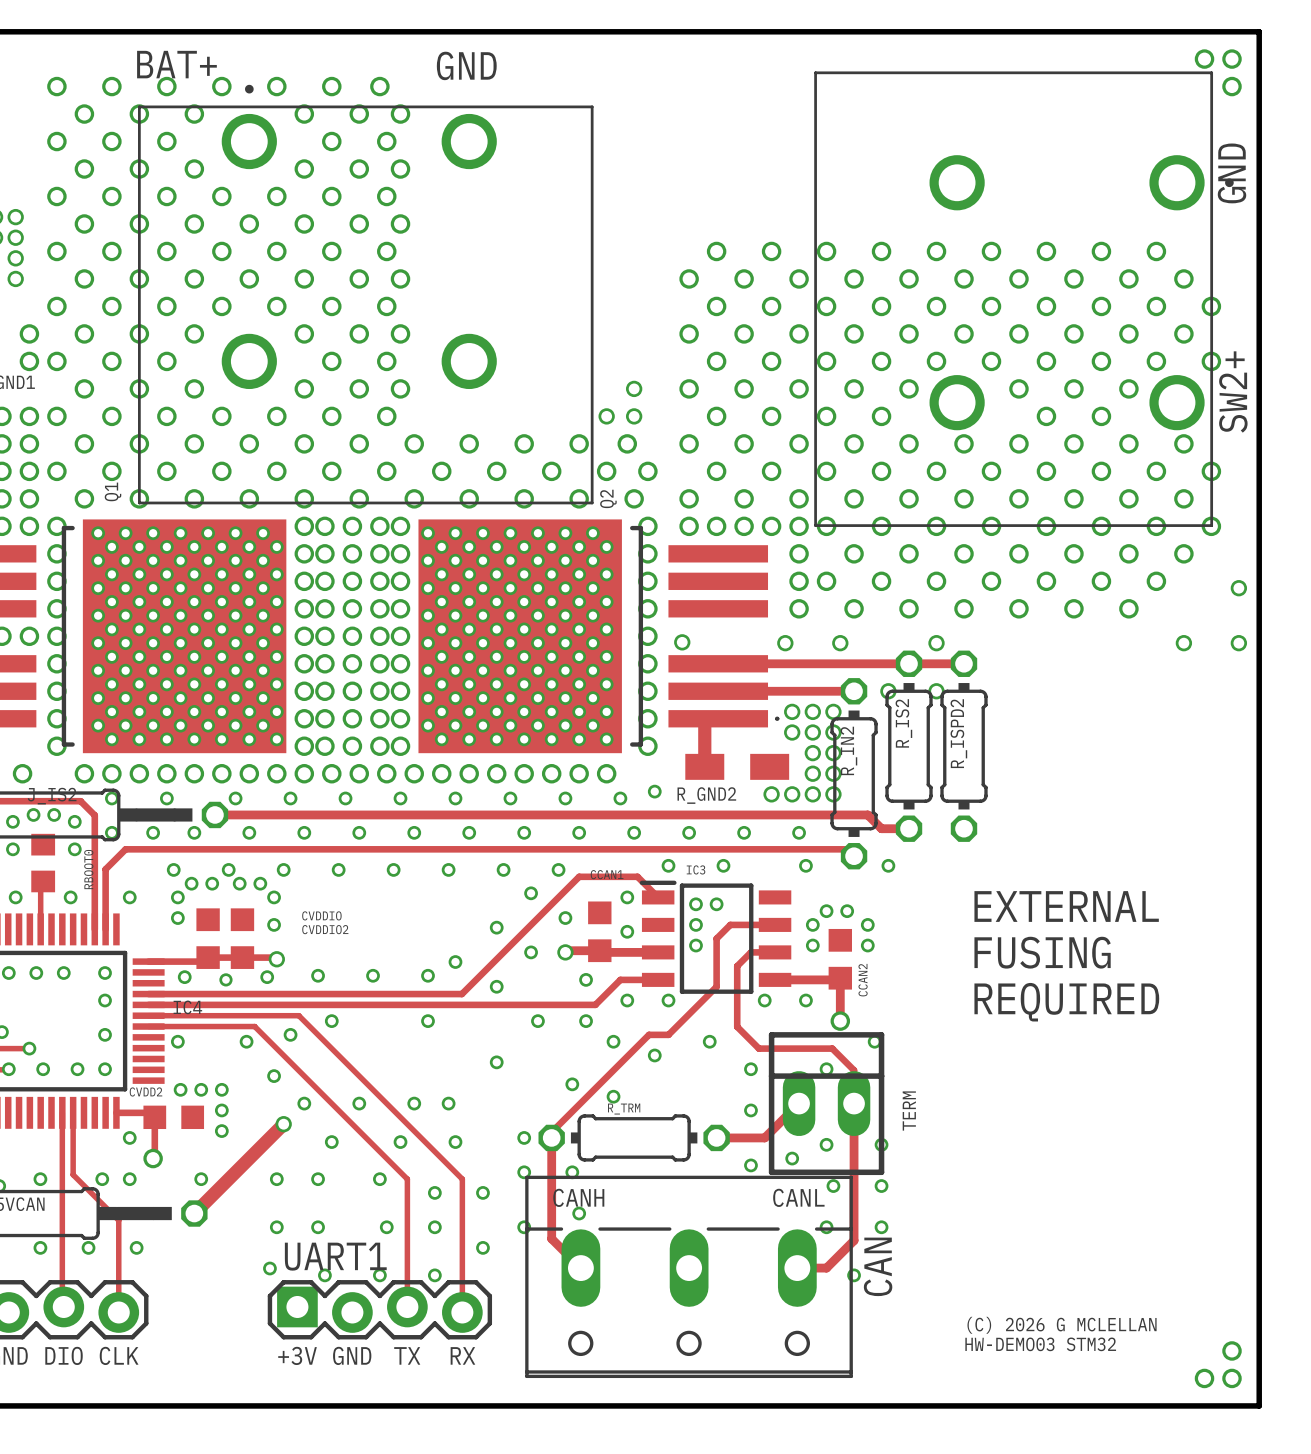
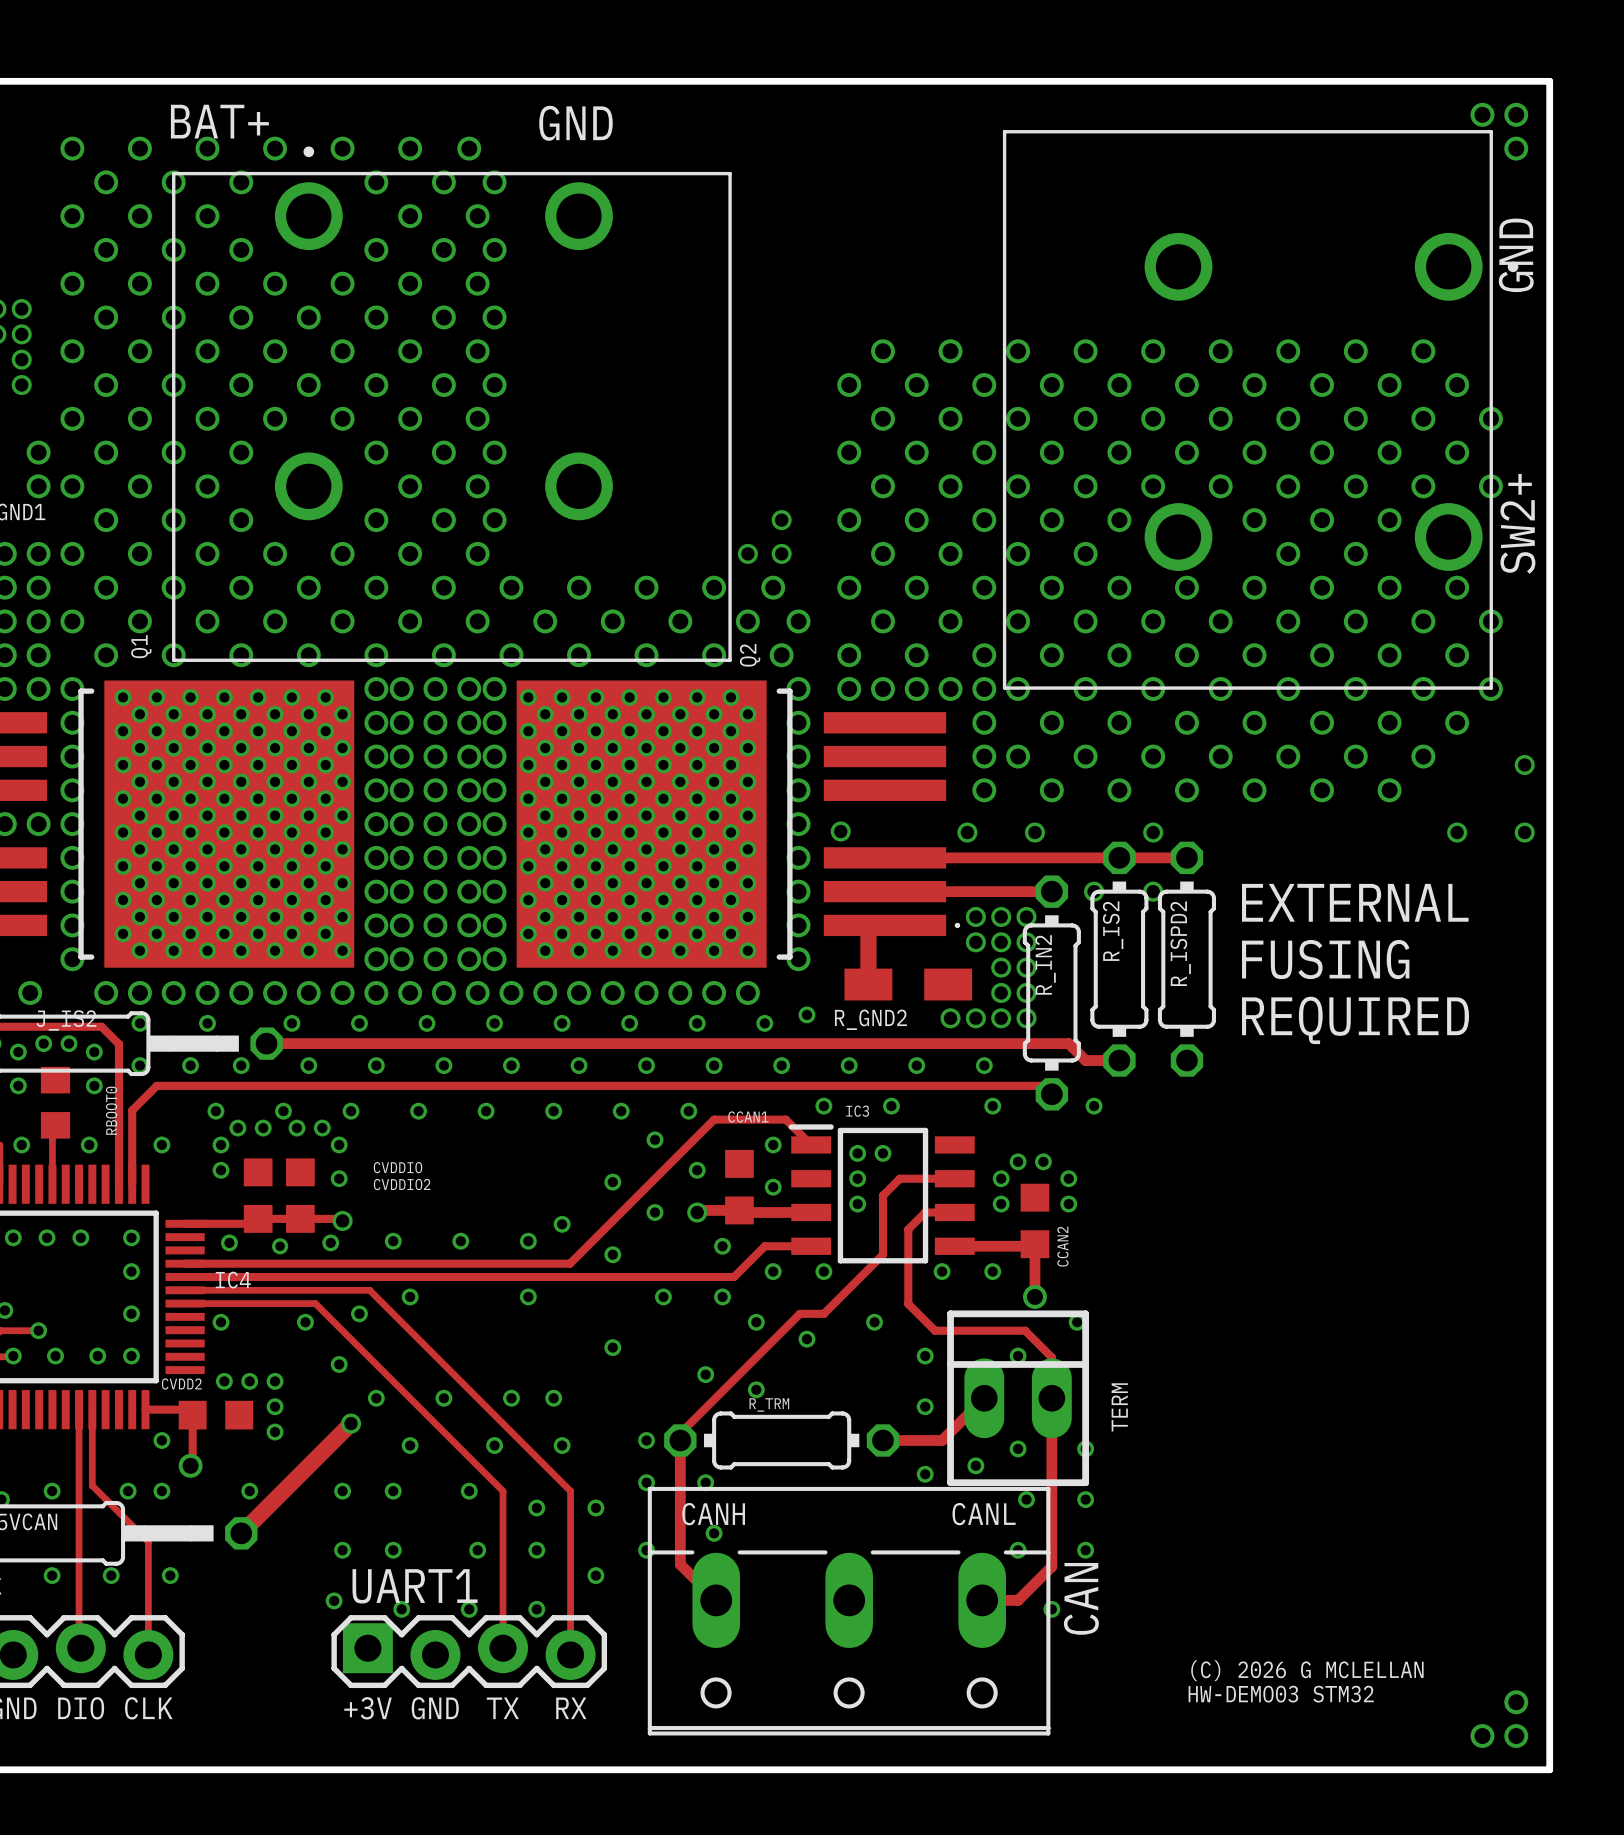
text position: EXTERNAL (1066, 906) -> EXTERNAL (1355, 902)
text position: FUSING (1042, 952) -> FUSING (1325, 959)
text position: REQUIRED (1066, 1002) -> REQUIRED (1355, 1020)

